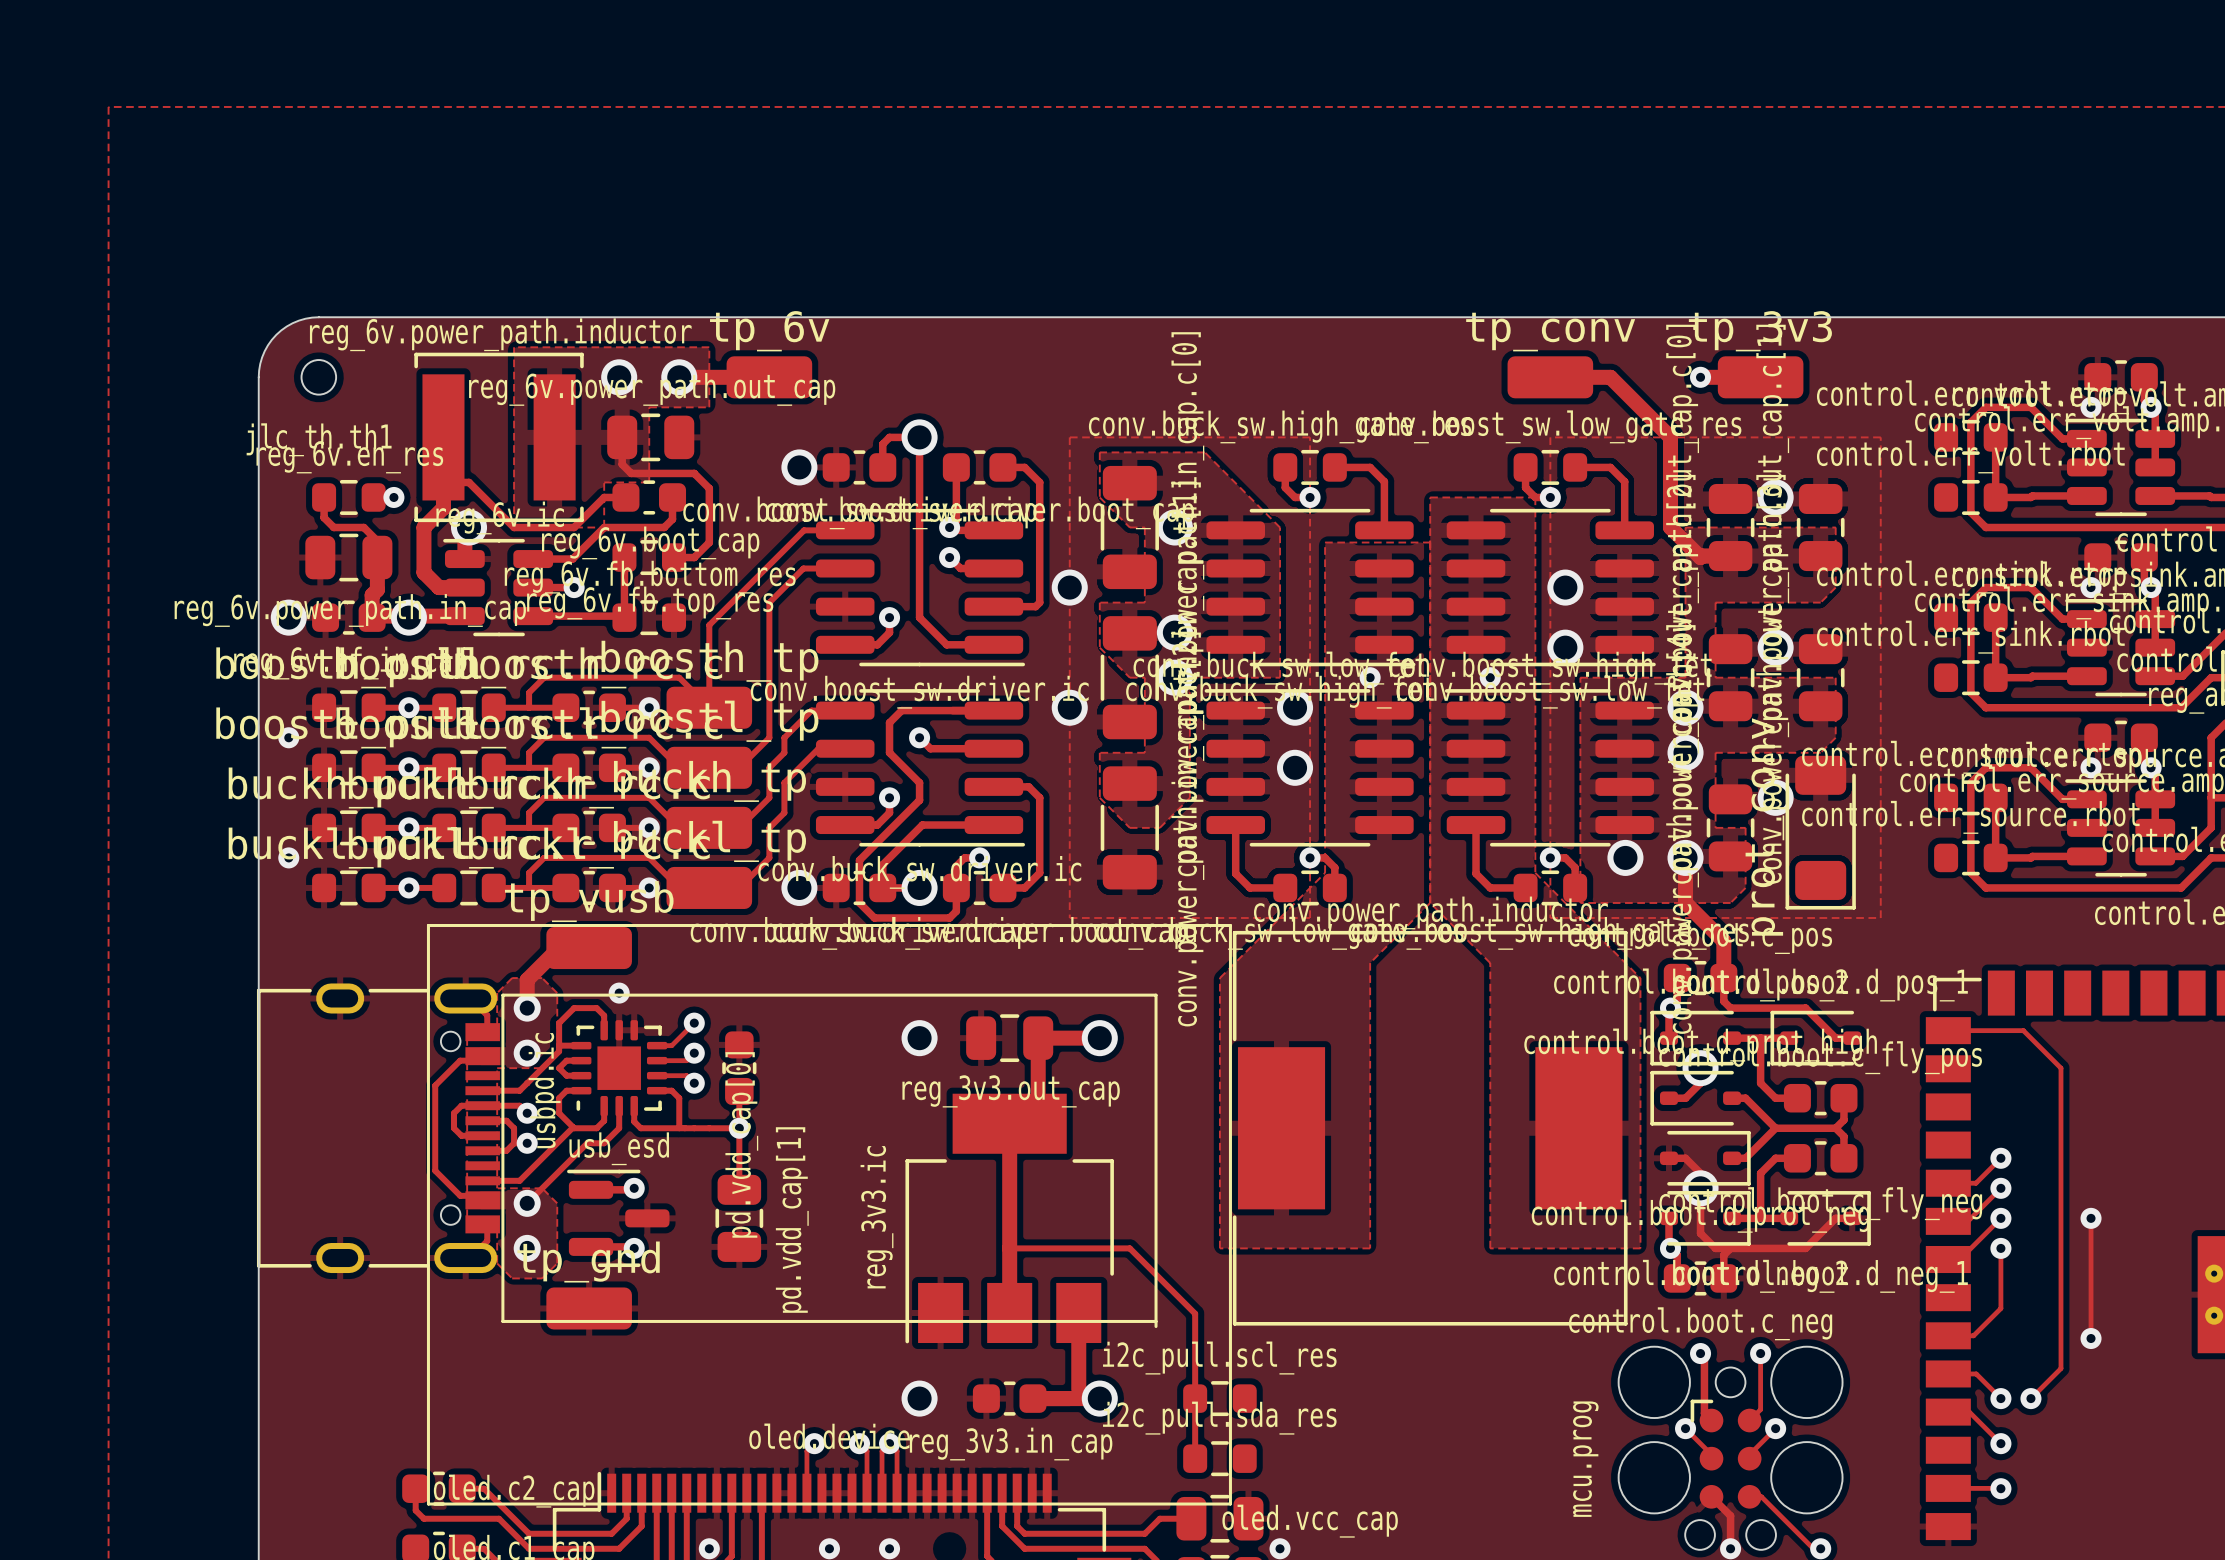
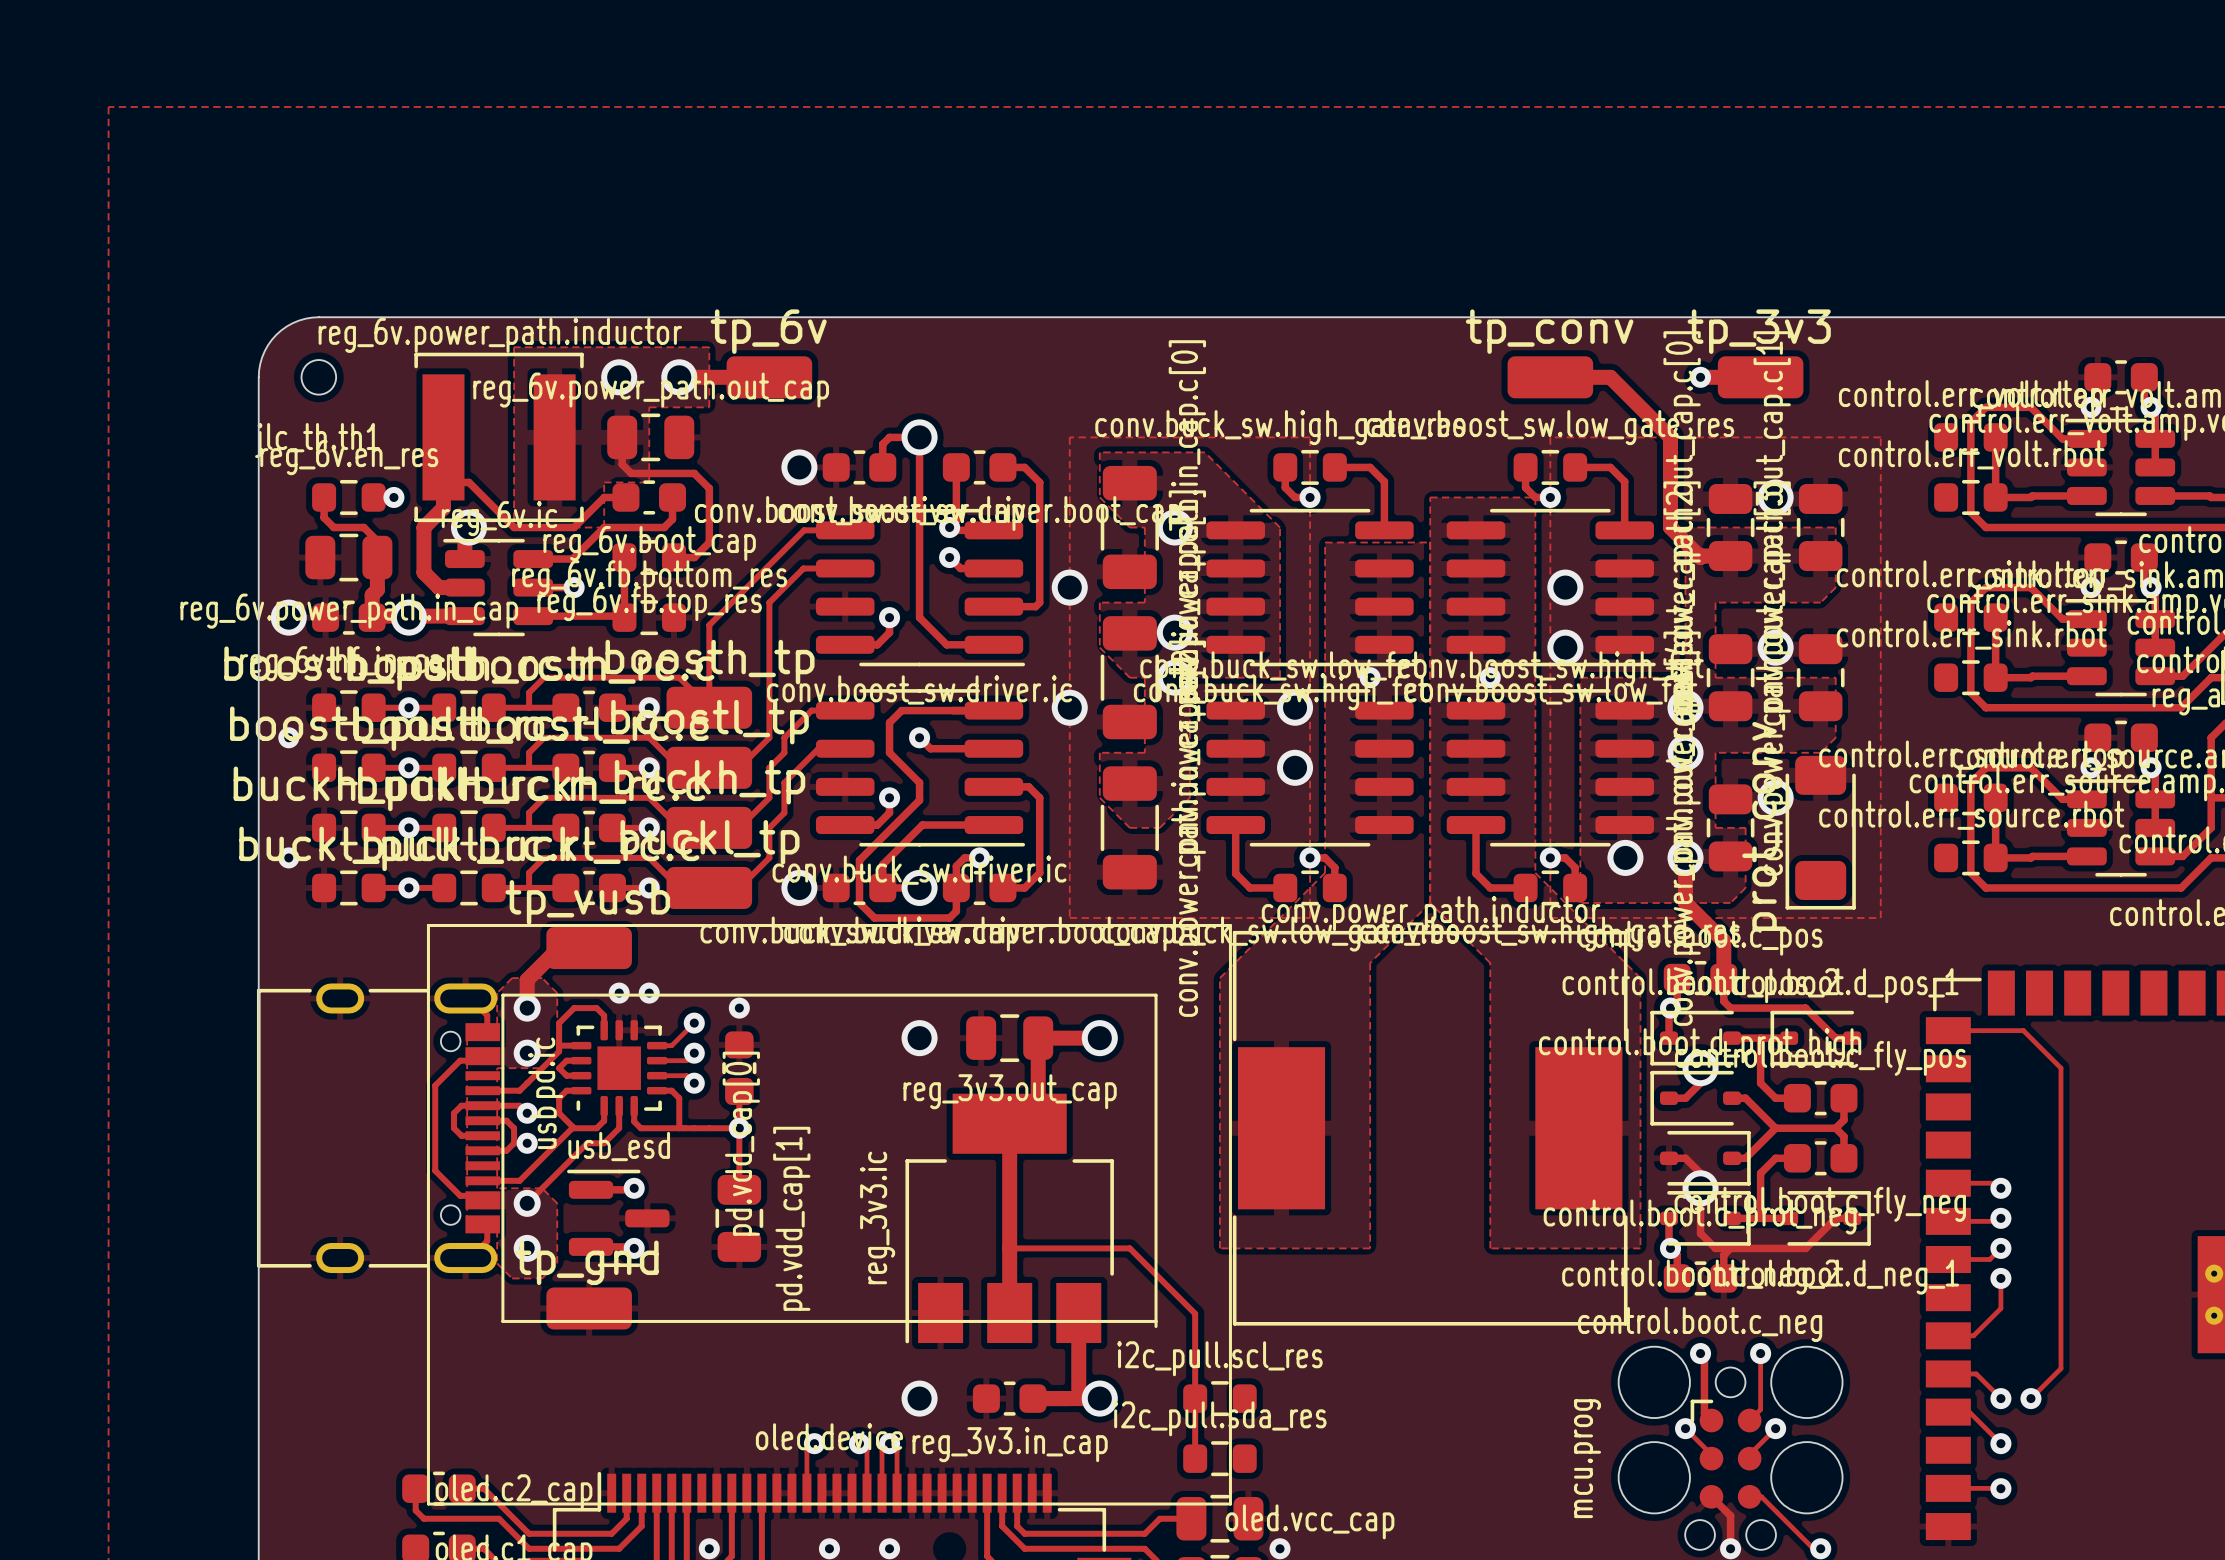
via: none -> (649, 993)
via: none -> (739, 1008)
track: (2000, 1158) (1975, 1183) -> (2000, 1188) (1995, 1183) (1975, 1183)
via: (2000, 1158) -> none
track: (2000, 1188) (1967, 1221) -> (1997, 1221) (1967, 1221)
track: (2091, 1218) (2091, 1338) -> none
via: (2091, 1218) -> none
track: (1997, 1221) (1959, 1259) -> (2000, 1248) (1989, 1259) (1959, 1259)
track: (2000, 1248) (2000, 1278) -> none
via: none -> (2000, 1278)
via: (2091, 1338) -> none

